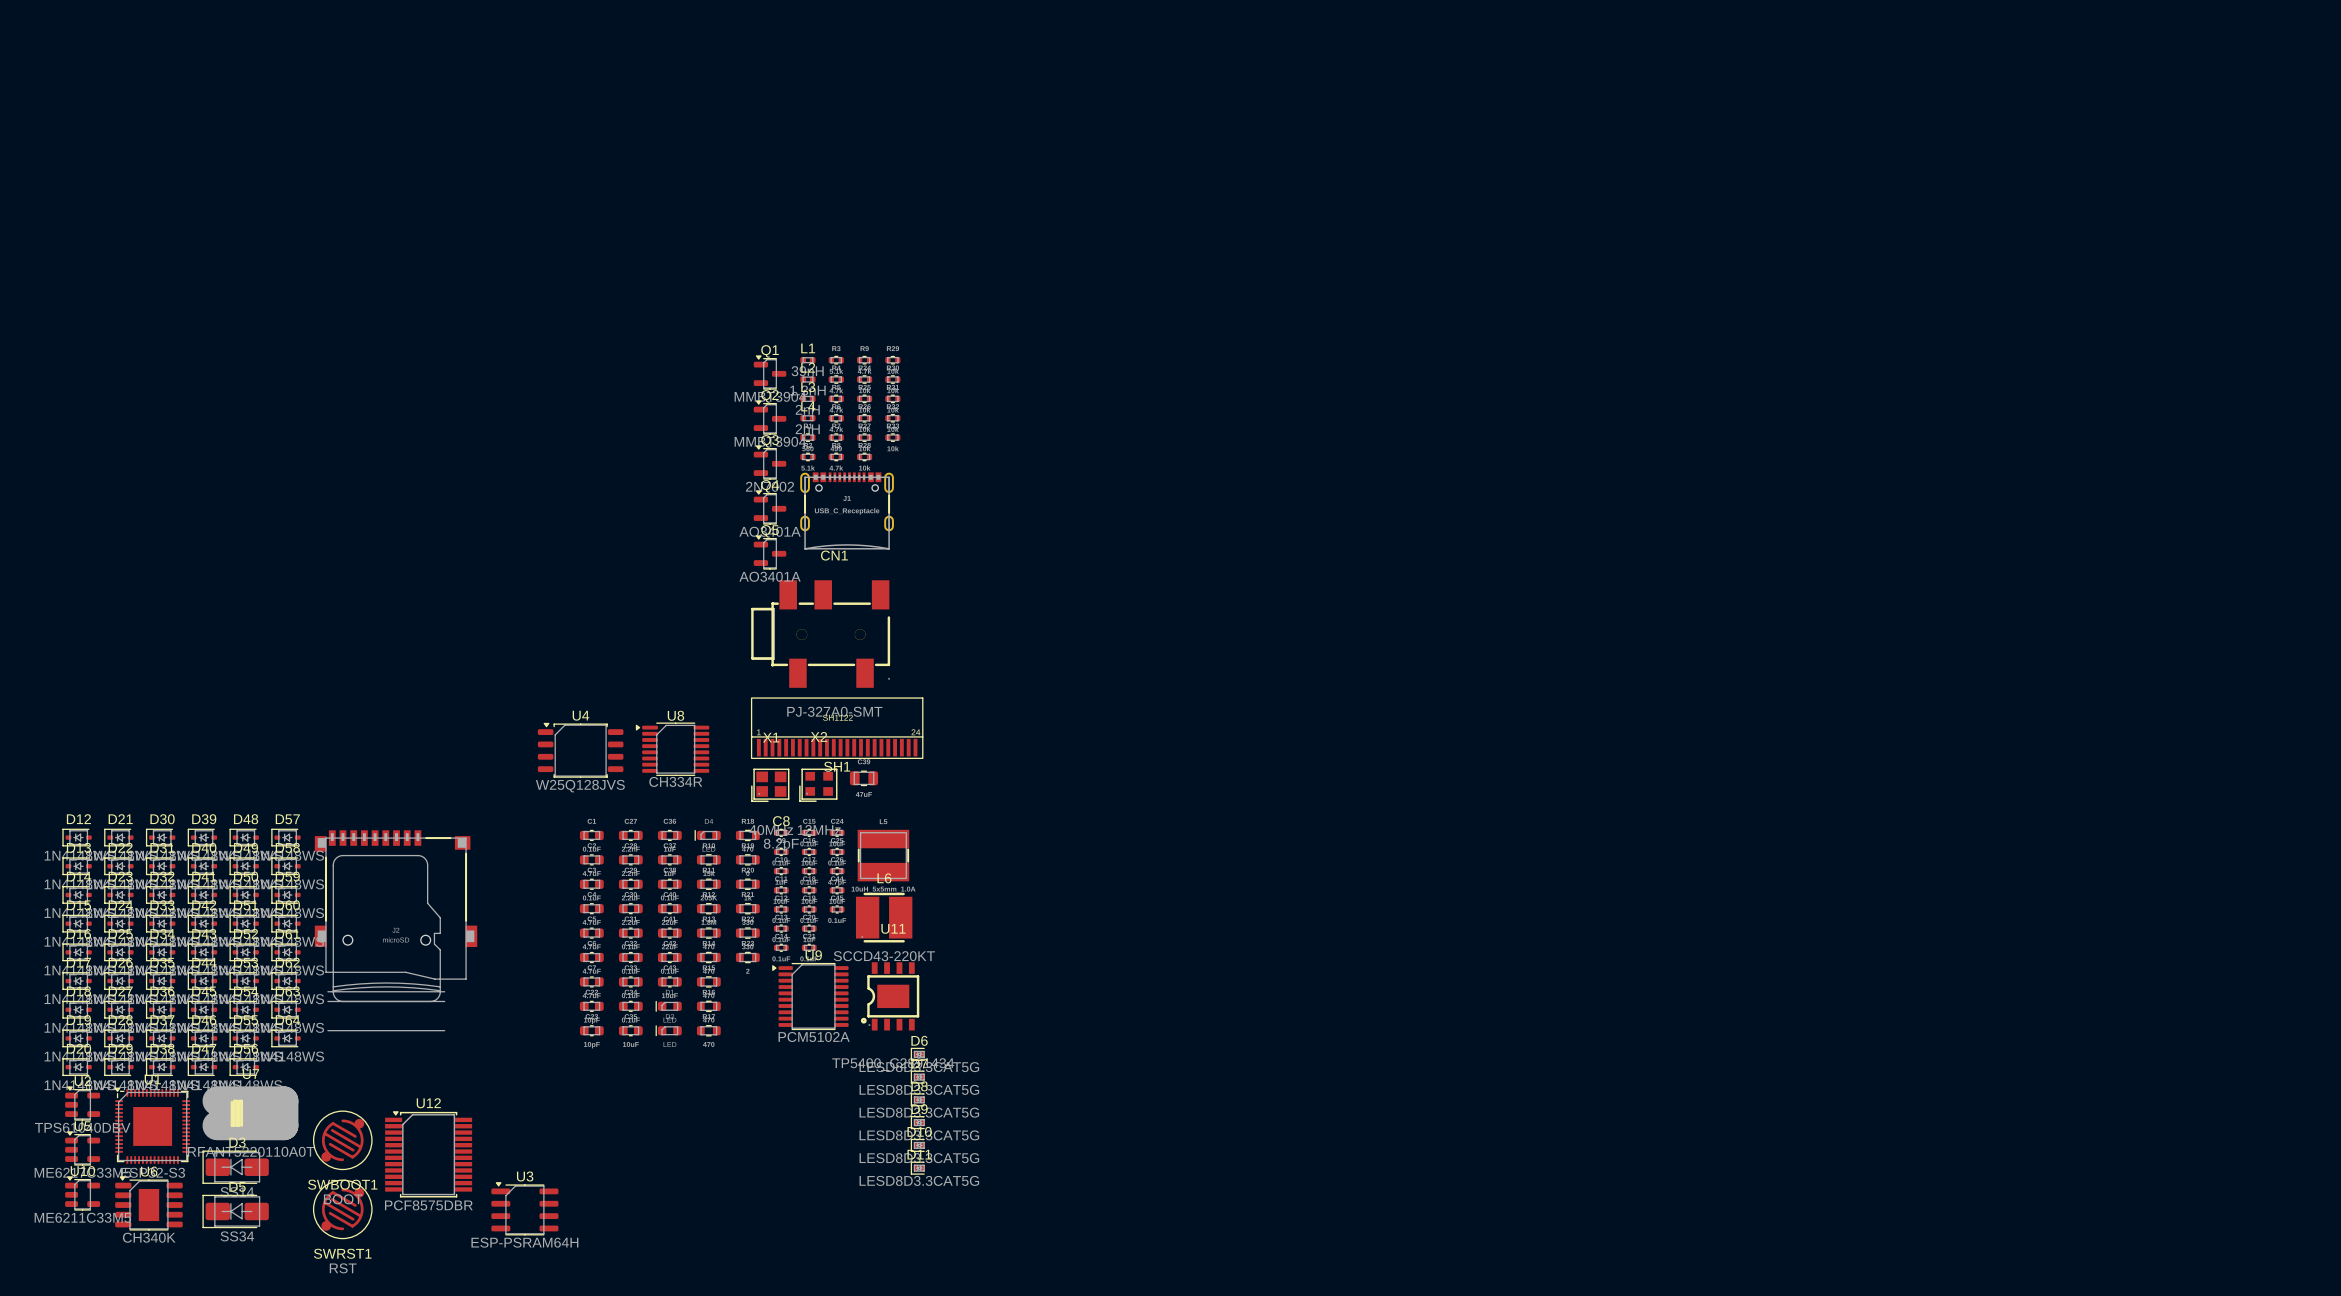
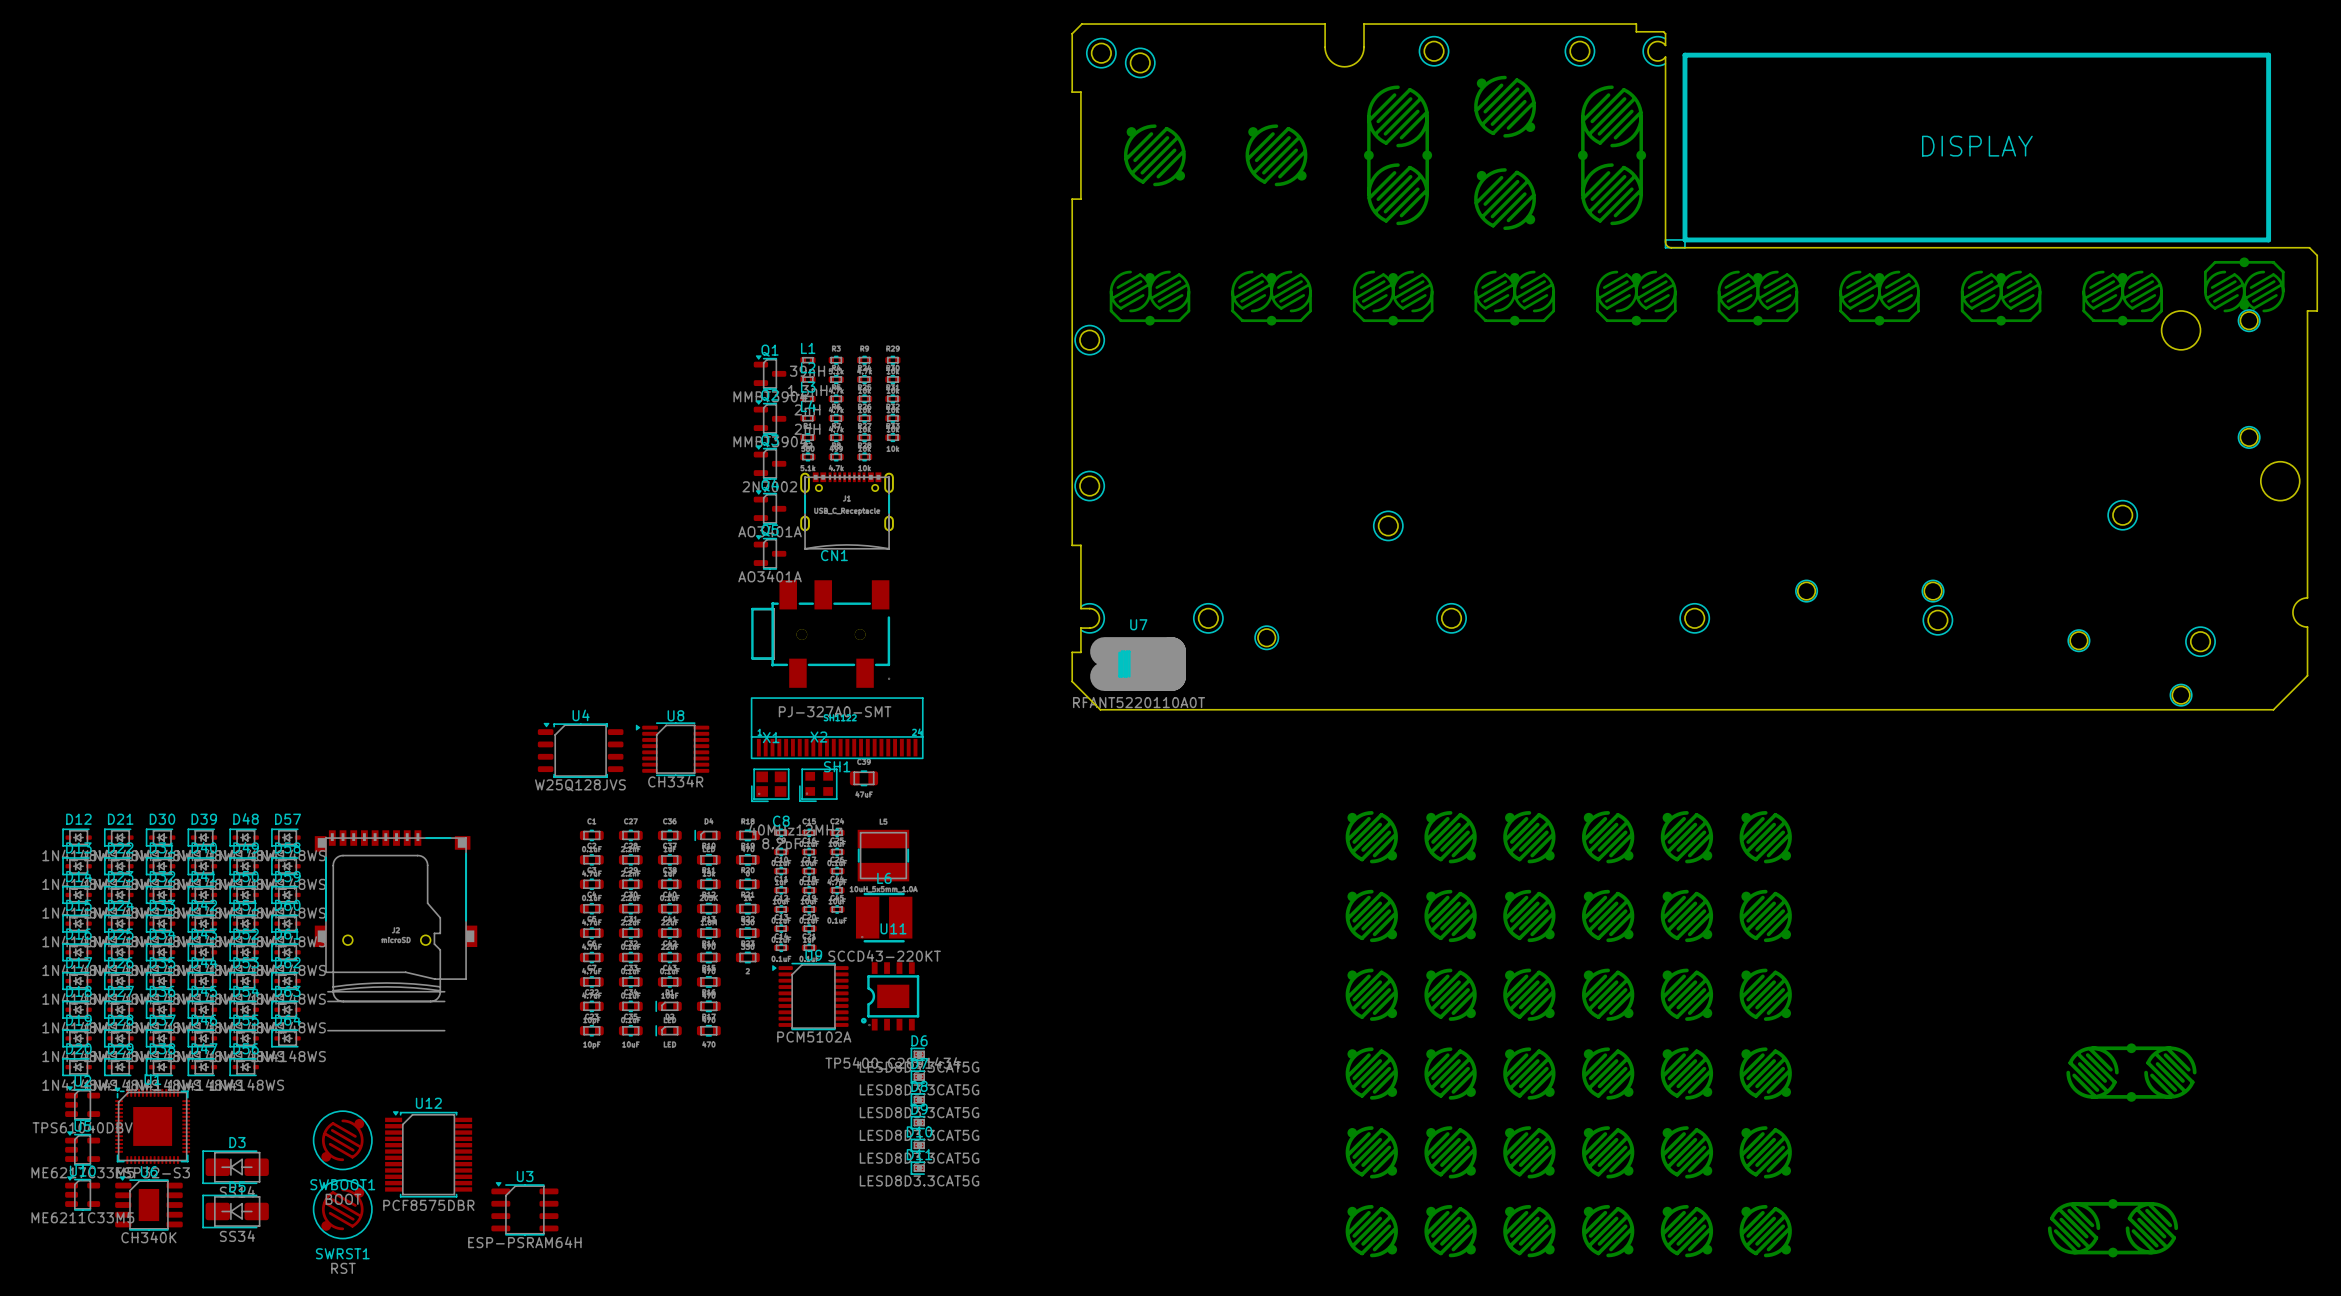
board edge: none -> (1081, 24) (1325, 24) (1326, 54) (1334, 64) (1344, 66) (1354, 64) (1362, 54) (1364, 24) (1636, 24) (1636, 31) (1663, 31) (1665, 33) (1665, 45) (1660, 41) (1654, 42) (1649, 45) (1648, 51) (1649, 56) (1654, 60) (1660, 60) (1665, 57) (1665, 241) (1670, 247) (2309, 247) (2317, 255) (2317, 310) (2307, 310) (2307, 597) (2297, 602) (2292, 612) (2297, 622) (2307, 627) (2307, 675) (2273, 709) (1100, 709) (1072, 681) (1072, 652) (1080, 652) (1080, 628) (1094, 626) (1099, 618) (1094, 609) (1080, 608) (1080, 545) (1072, 545) (1072, 199) (1080, 199) (1080, 92) (1072, 92) (1072, 33) (1081, 24)
drawing: none -> [1418, 36, 1450, 67]
drawing: none -> [1564, 36, 1596, 67]
drawing: none -> [1086, 38, 1156, 79]
line: none -> (1665, 38) (1658, 36) (1649, 38) (1644, 44) (1643, 51) (1644, 58) (1649, 63) (1658, 65) (1665, 63)
round board edge: none -> [1424, 41, 1445, 62]
round board edge: none -> [1569, 41, 1590, 62]
round board edge: none -> [1091, 43, 1112, 64]
round board edge: none -> [1130, 52, 1151, 73]
part: none -> (1505, 106)
text: none -> DISPLAY (1977, 146)
part: none -> (1154, 155)
part: none -> (1276, 155)
part: none -> (1398, 155)
part: none -> (1612, 155)
part: none -> (1505, 199)
line: none -> (1684, 239) (2268, 239) (2268, 55) (1684, 55) (1684, 239)
line: none -> (1684, 239) (1665, 239) (1665, 247) (1684, 247) (1684, 239)
part: none -> (2244, 284)
part: none -> (1150, 298)
part: none -> (1271, 298)
part: none -> (1393, 298)
part: none -> (1514, 298)
part: none -> (1636, 298)
part: none -> (1757, 298)
part: none -> (1879, 298)
part: none -> (2001, 298)
part: none -> (2122, 298)
drawing: none -> [2237, 309, 2261, 332]
round board edge: none -> [2161, 310, 2201, 351]
round board edge: none -> [2240, 311, 2259, 330]
drawing: none -> [1074, 325, 1105, 356]
round board edge: none -> [1079, 330, 1100, 351]
drawing: none -> [2237, 426, 2261, 449]
round board edge: none -> [2240, 428, 2259, 447]
round board edge: none -> [2260, 461, 2300, 501]
drawing: none -> [1074, 470, 1105, 502]
round board edge: none -> [1079, 476, 1100, 497]
drawing: none -> [2107, 500, 2138, 531]
round board edge: none -> [2112, 505, 2133, 526]
drawing: none -> [1373, 510, 1404, 542]
round board edge: none -> [1378, 515, 1399, 536]
drawing: none -> [1795, 579, 1818, 603]
drawing: none -> [1921, 579, 1953, 636]
round board edge: none -> [1797, 582, 1816, 601]
round board edge: none -> [1924, 582, 1943, 601]
drawing: none -> [1193, 603, 1224, 634]
drawing: none -> [1436, 603, 1467, 634]
drawing: none -> [1679, 603, 1710, 634]
line: none -> (1080, 606) (1087, 603) (1095, 604) (1101, 609) (1104, 618) (1101, 627) (1095, 631) (1087, 632) (1080, 630)
round board edge: none -> [1198, 608, 1219, 629]
round board edge: none -> [1441, 608, 1462, 629]
round board edge: none -> [1684, 608, 1705, 629]
round board edge: none -> [1927, 610, 1948, 631]
drawing: none -> [1254, 625, 1279, 650]
drawing: none -> [2185, 626, 2216, 657]
round board edge: none -> [1257, 628, 1276, 647]
drawing: none -> [2067, 629, 2091, 652]
round board edge: none -> [2069, 631, 2088, 650]
round board edge: none -> [2190, 631, 2211, 652]
drawing: none -> [2169, 683, 2193, 707]
round board edge: none -> [2172, 686, 2191, 705]
part: none -> (1371, 837)
part: none -> (1450, 837)
part: none -> (1529, 837)
part: none -> (1608, 837)
part: none -> (1686, 837)
part: none -> (1765, 837)
part: none -> (1371, 915)
part: none -> (1450, 915)
part: none -> (1529, 915)
part: none -> (1608, 915)
part: none -> (1686, 915)
part: none -> (1765, 915)
part: none -> (1371, 994)
part: none -> (1450, 994)
part: none -> (1529, 994)
part: none -> (1608, 994)
part: none -> (1686, 994)
part: none -> (1765, 994)
part: none -> (2131, 1072)
part: none -> (1371, 1073)
part: none -> (1450, 1073)
part: none -> (1529, 1073)
part: none -> (1608, 1073)
part: none -> (1686, 1073)
part: none -> (1765, 1073)
U7 position: (250, 1113) -> (1138, 664)
part: none -> (1371, 1152)
part: none -> (1450, 1152)
part: none -> (1529, 1152)
part: none -> (1608, 1152)
part: none -> (1686, 1152)
part: none -> (1765, 1152)
part: none -> (2112, 1228)
part: none -> (1371, 1231)
part: none -> (1450, 1231)
part: none -> (1529, 1231)
part: none -> (1608, 1231)
part: none -> (1686, 1231)
part: none -> (1765, 1231)

